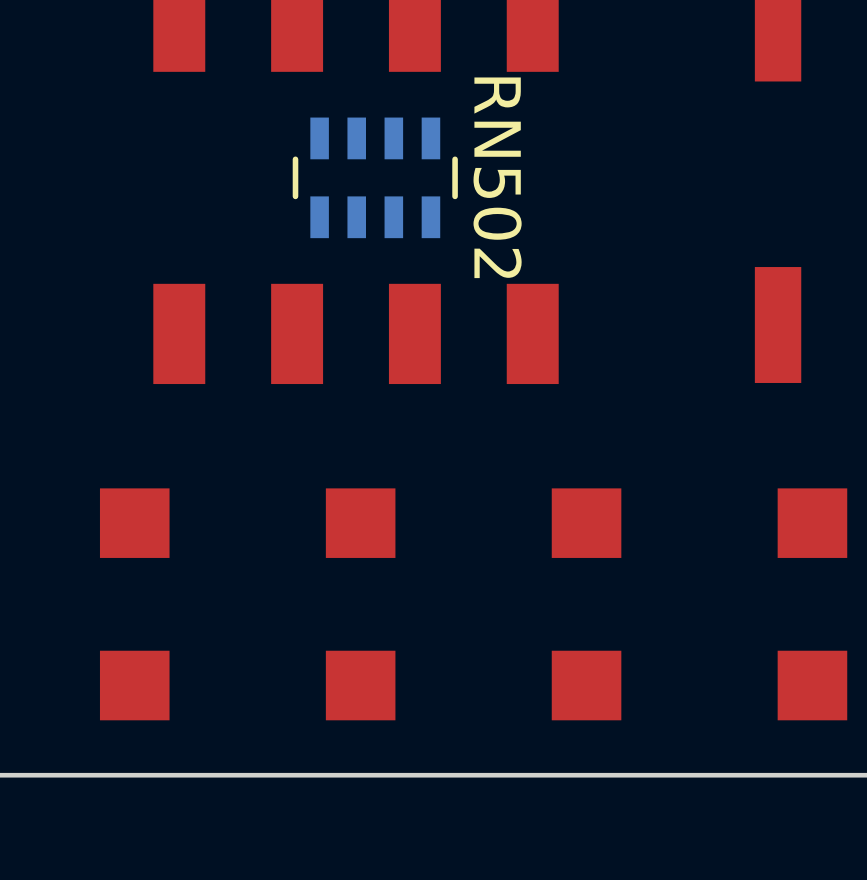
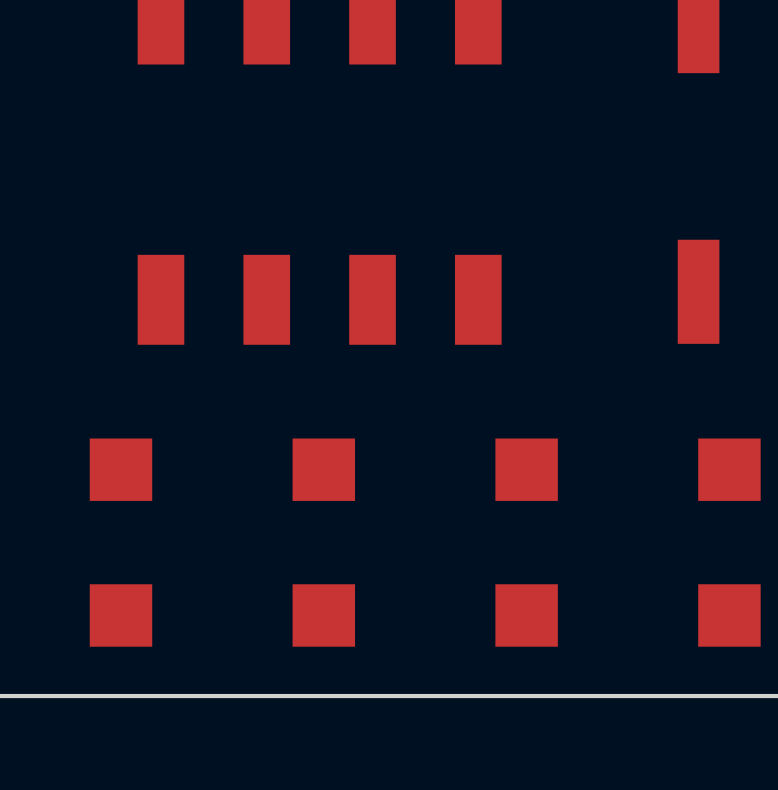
RN502: (375, 177) -> none

